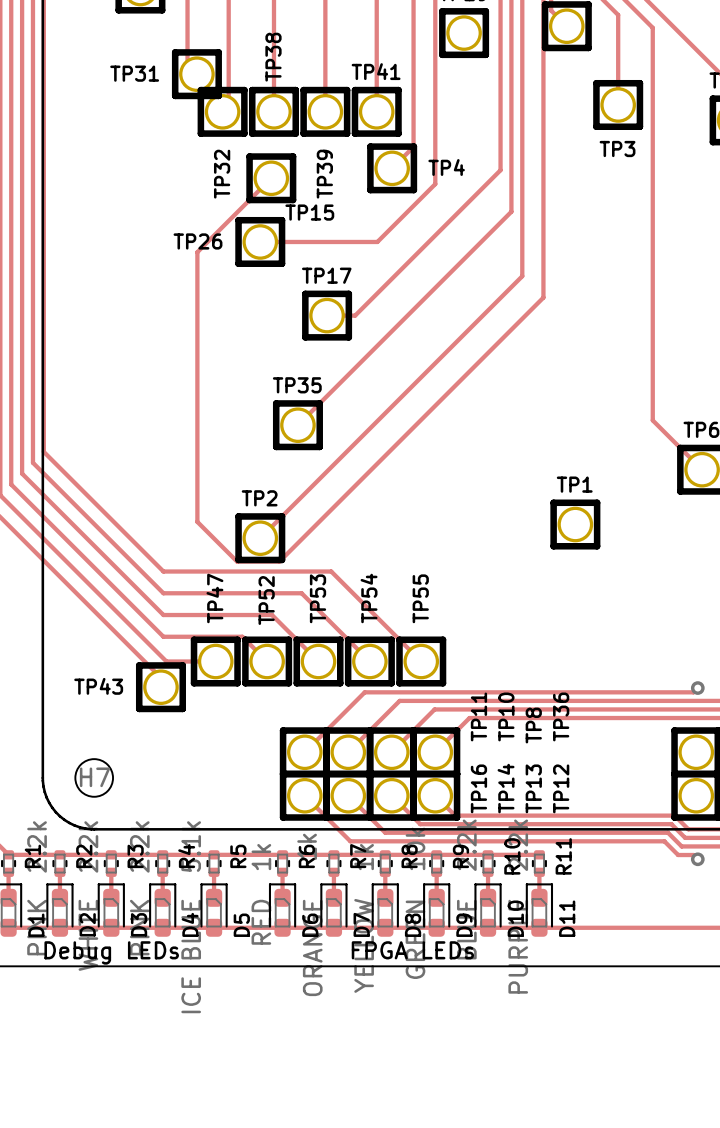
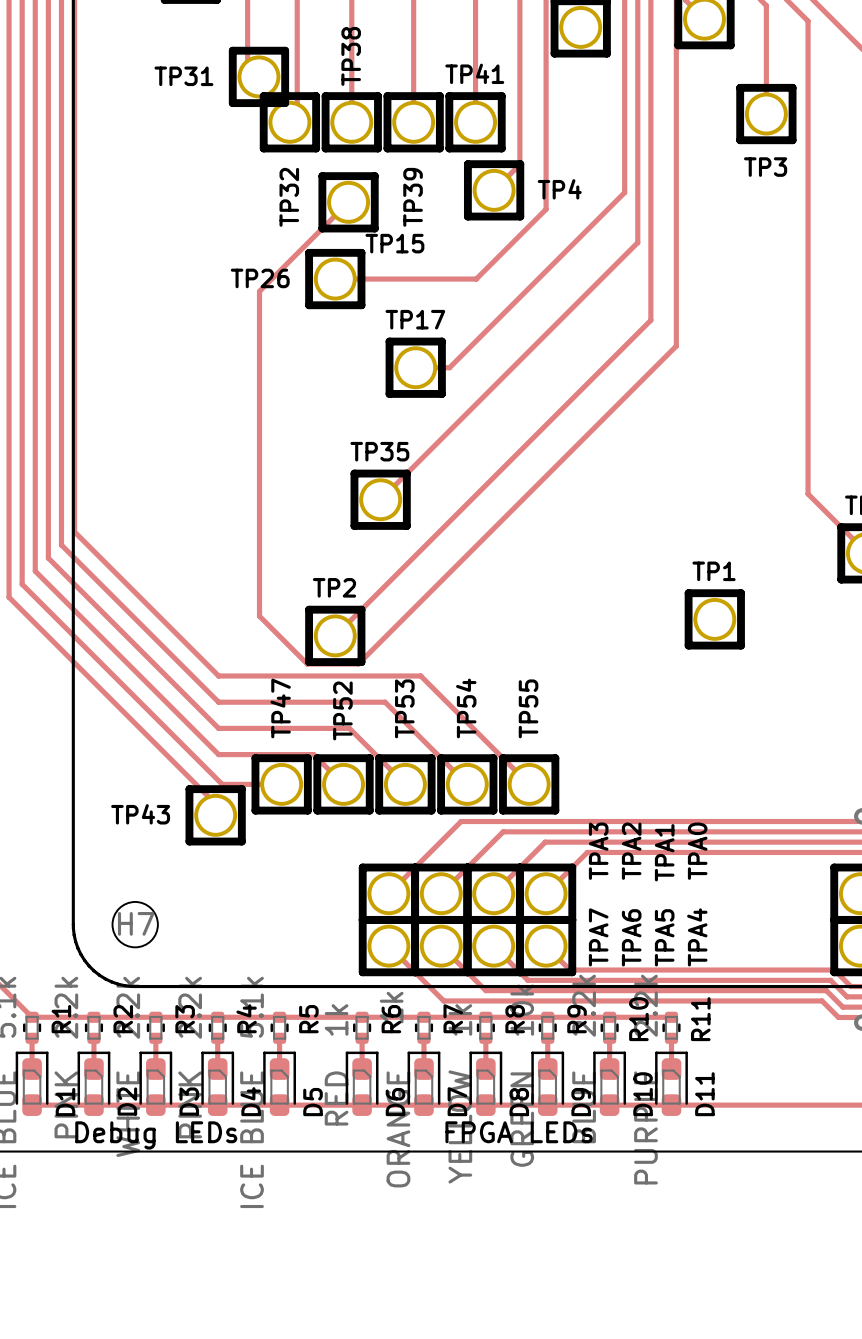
TP11 name: TP11 (478, 716) -> TPA3 (598, 851)
TP10 name: TP10 (506, 716) -> TPA2 (631, 851)
TP36 name: TP36 (561, 716) -> TPA0 (697, 851)
TP8 name: TP8 (533, 725) -> TPA1 (664, 852)
TP16 name: TP16 (478, 788) -> TPA7 (598, 937)
TP14 name: TP14 (506, 788) -> TPA6 (631, 937)
TP13 name: TP13 (533, 788) -> TPA5 (664, 937)
TP12 name: TP12 (561, 788) -> TPA4 (697, 937)

